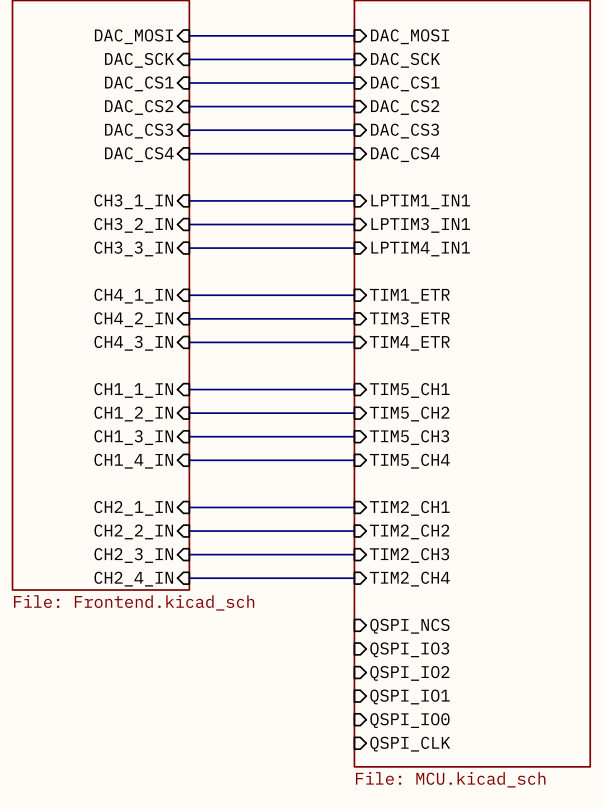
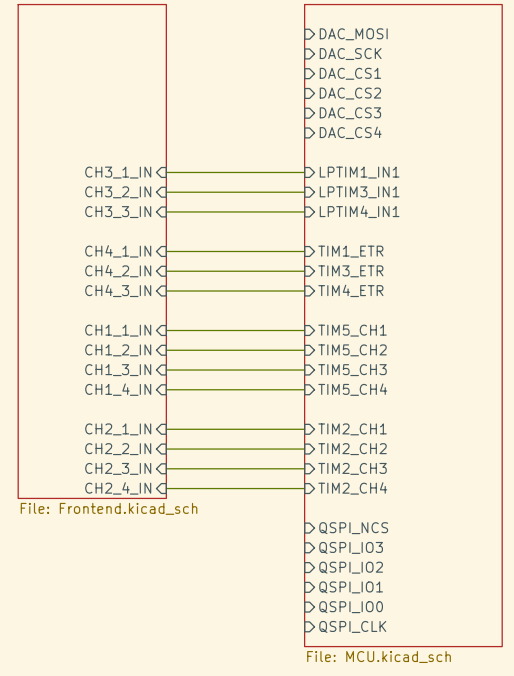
wire: (189, 35) (354, 35) -> none
sheet pin: DAC_MOSI (133, 36) -> none
wire: (189, 59) (354, 59) -> none
sheet pin: DAC_SCK (139, 60) -> none
sheet pin: DAC_CS1 (139, 83) -> none
wire: (189, 83) (354, 83) -> none
wire: (189, 106) (354, 106) -> none
sheet pin: DAC_CS2 (139, 107) -> none
wire: (189, 130) (354, 130) -> none
sheet pin: DAC_CS3 (139, 131) -> none
wire: (189, 153) (354, 153) -> none
sheet pin: DAC_CS4 (139, 154) -> none

